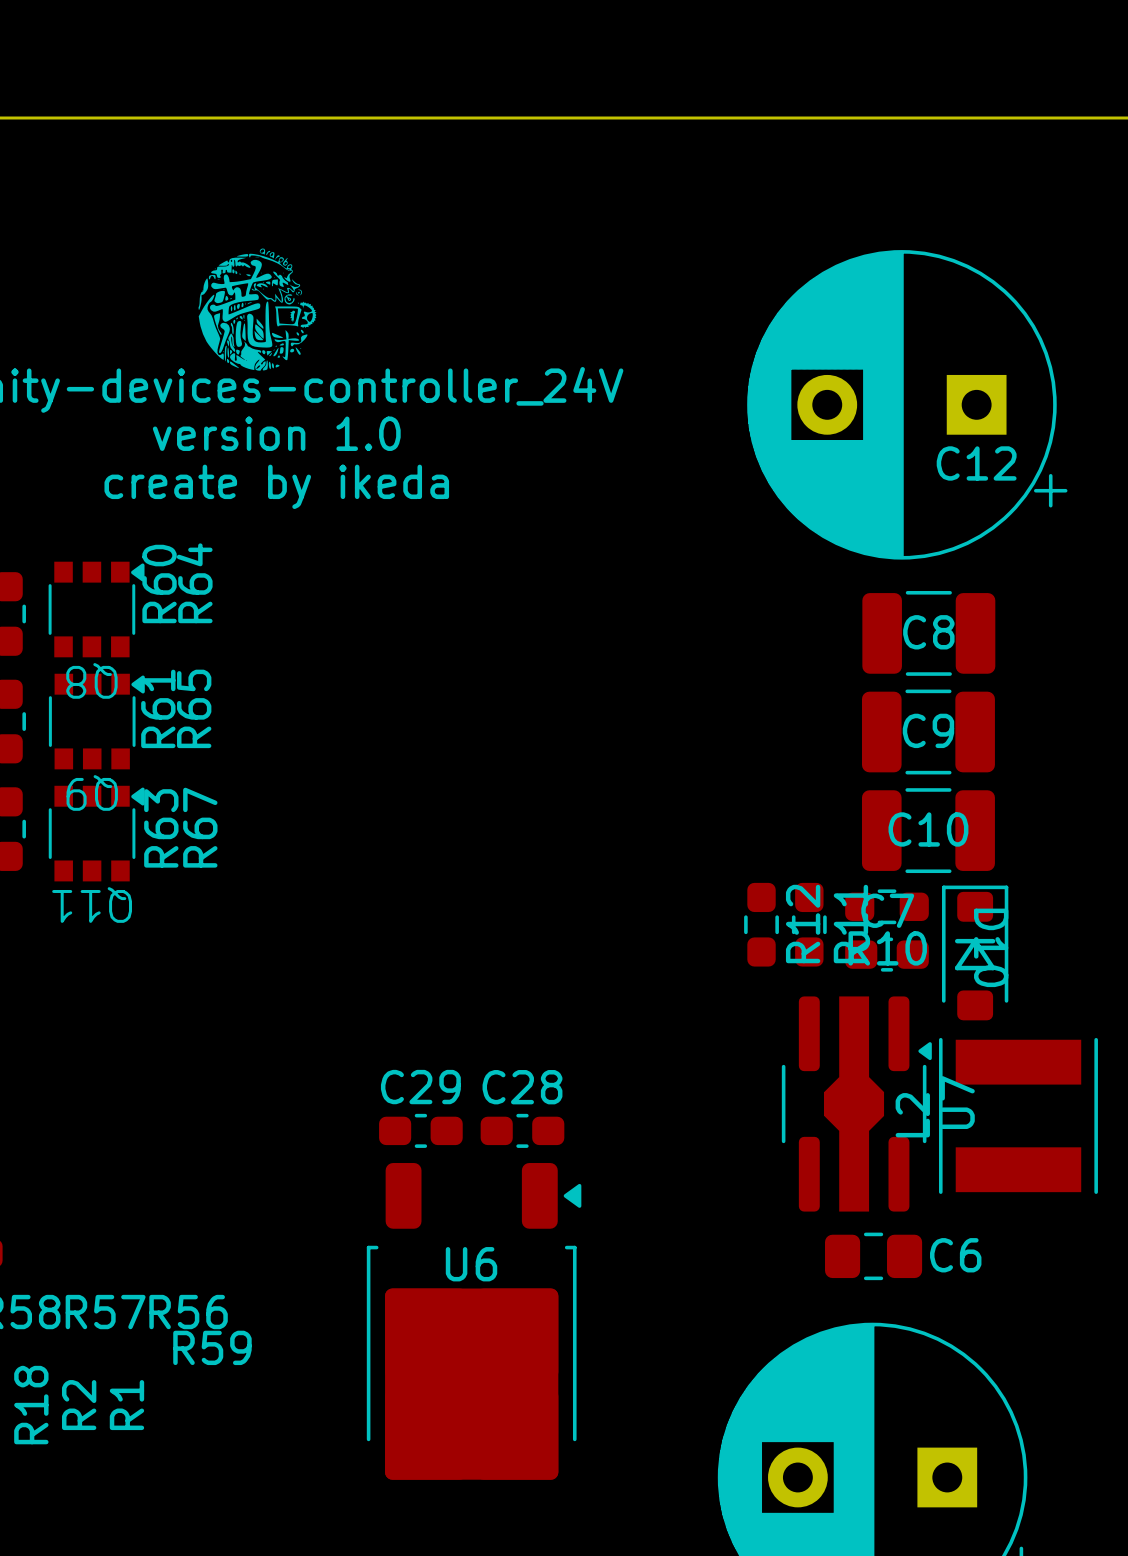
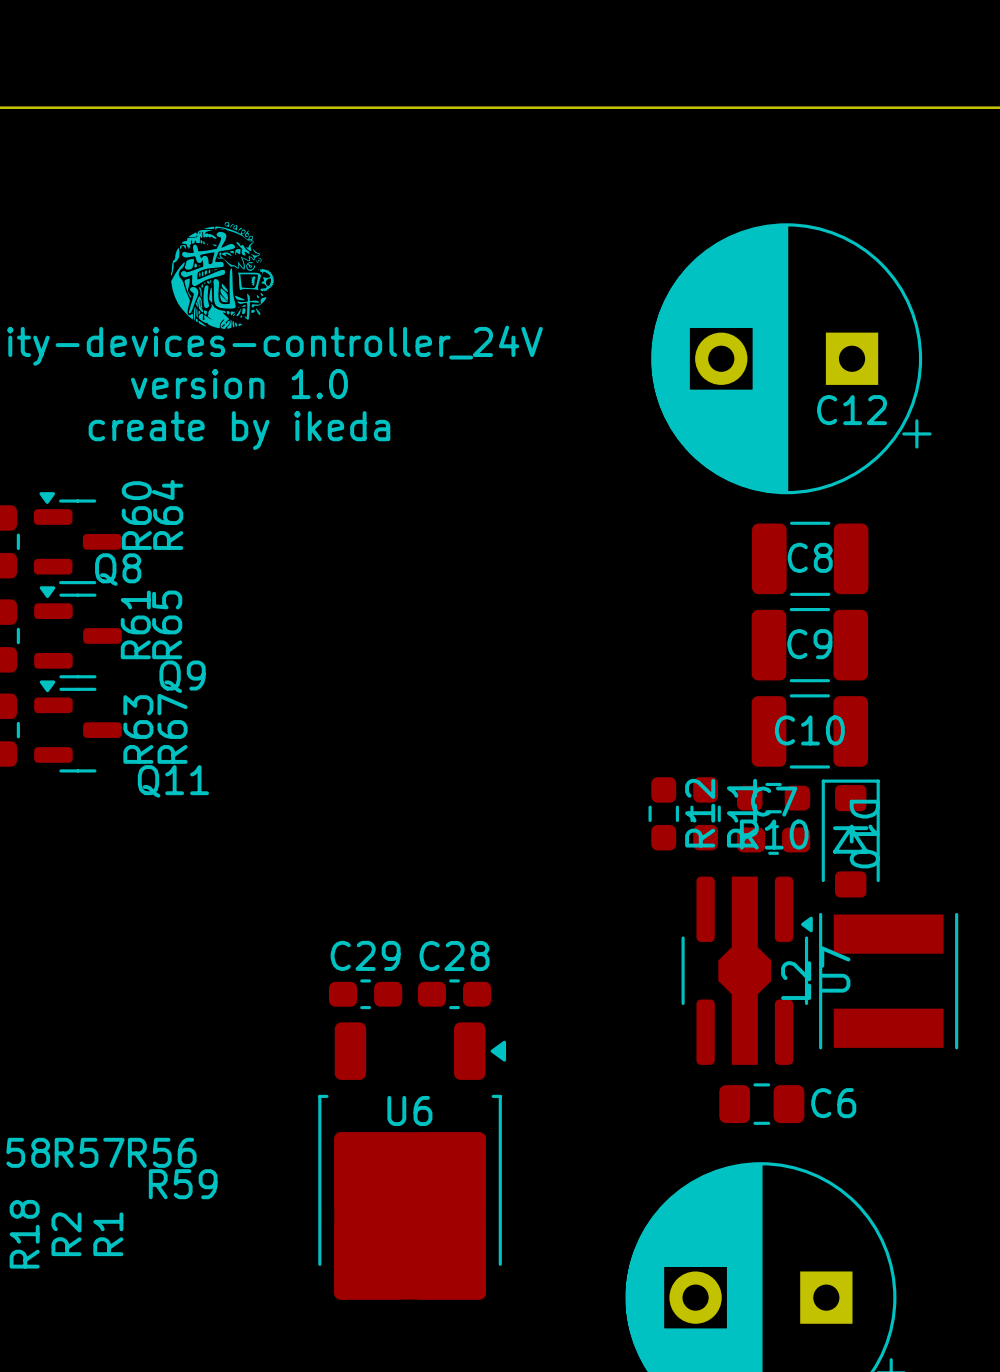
Q8 footprint: [48, 561, 145, 658] -> [33, 492, 122, 585]
Q9 footprint: [48, 673, 145, 770] -> [34, 586, 122, 679]
Q8 name position: Q8 (91, 680) -> Q8 (118, 569)
Q11 footprint: [48, 785, 145, 882] -> [34, 680, 122, 773]
Q9 name position: Q9 (92, 792) -> Q9 (182, 676)
Q11 name position: Q11 (92, 905) -> Q11 (173, 781)

